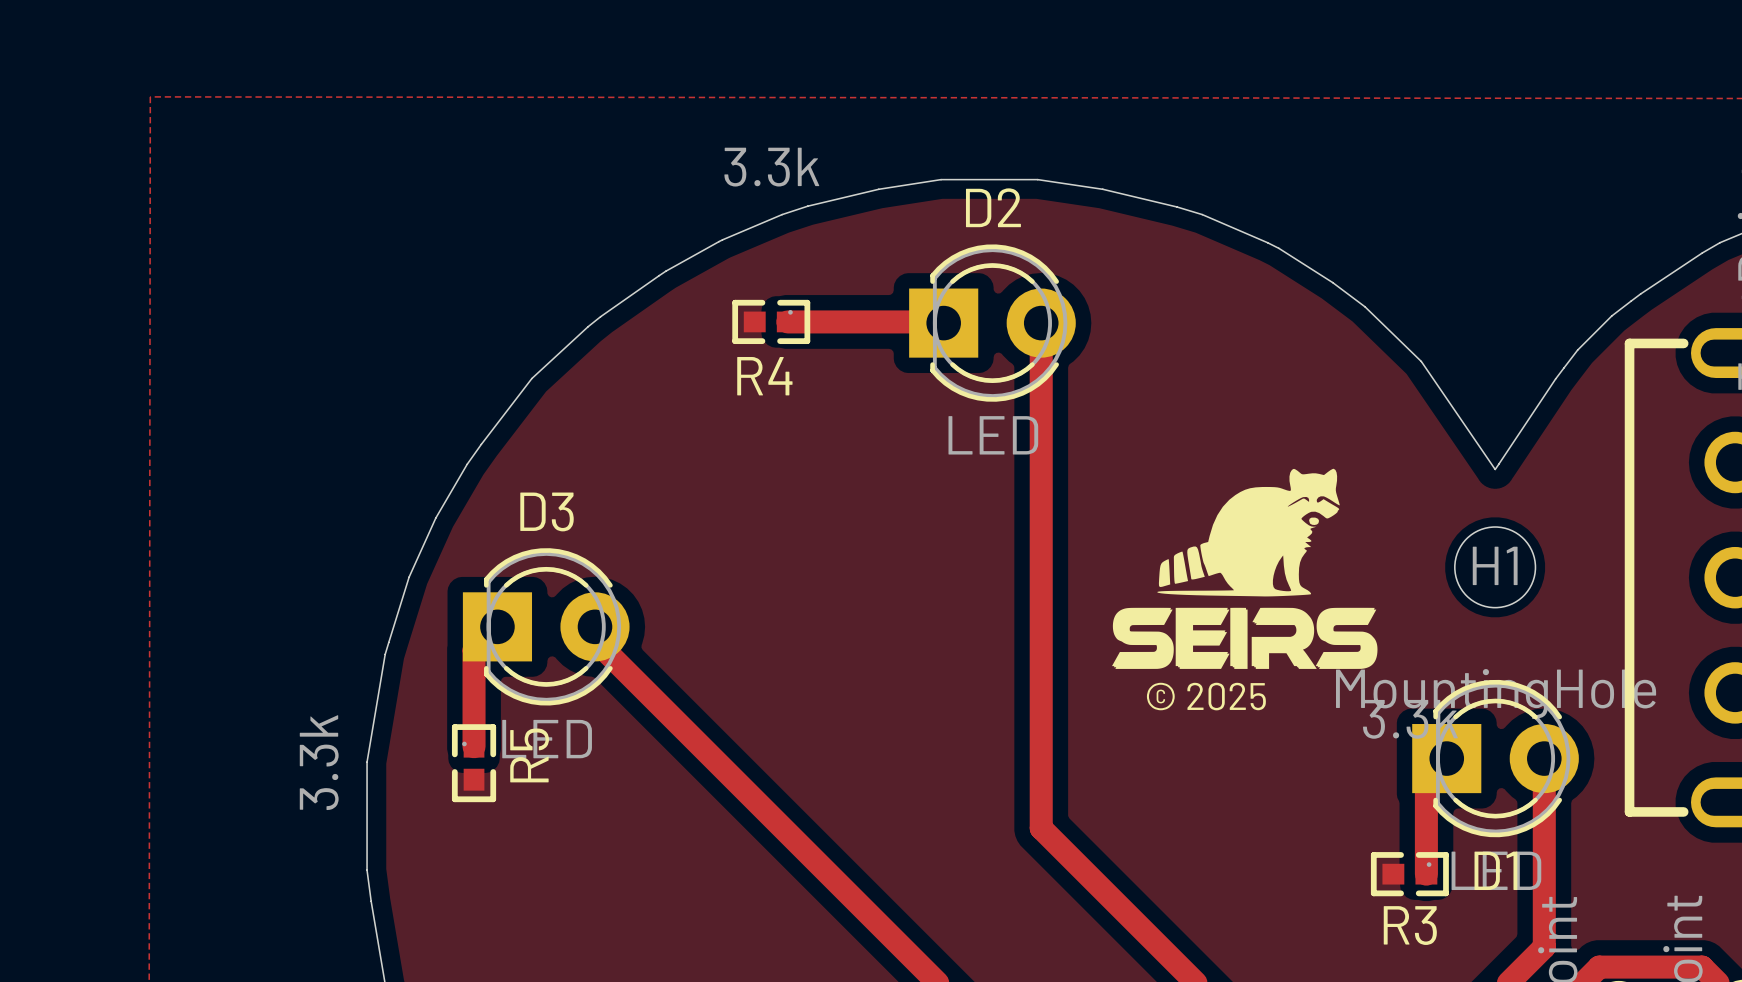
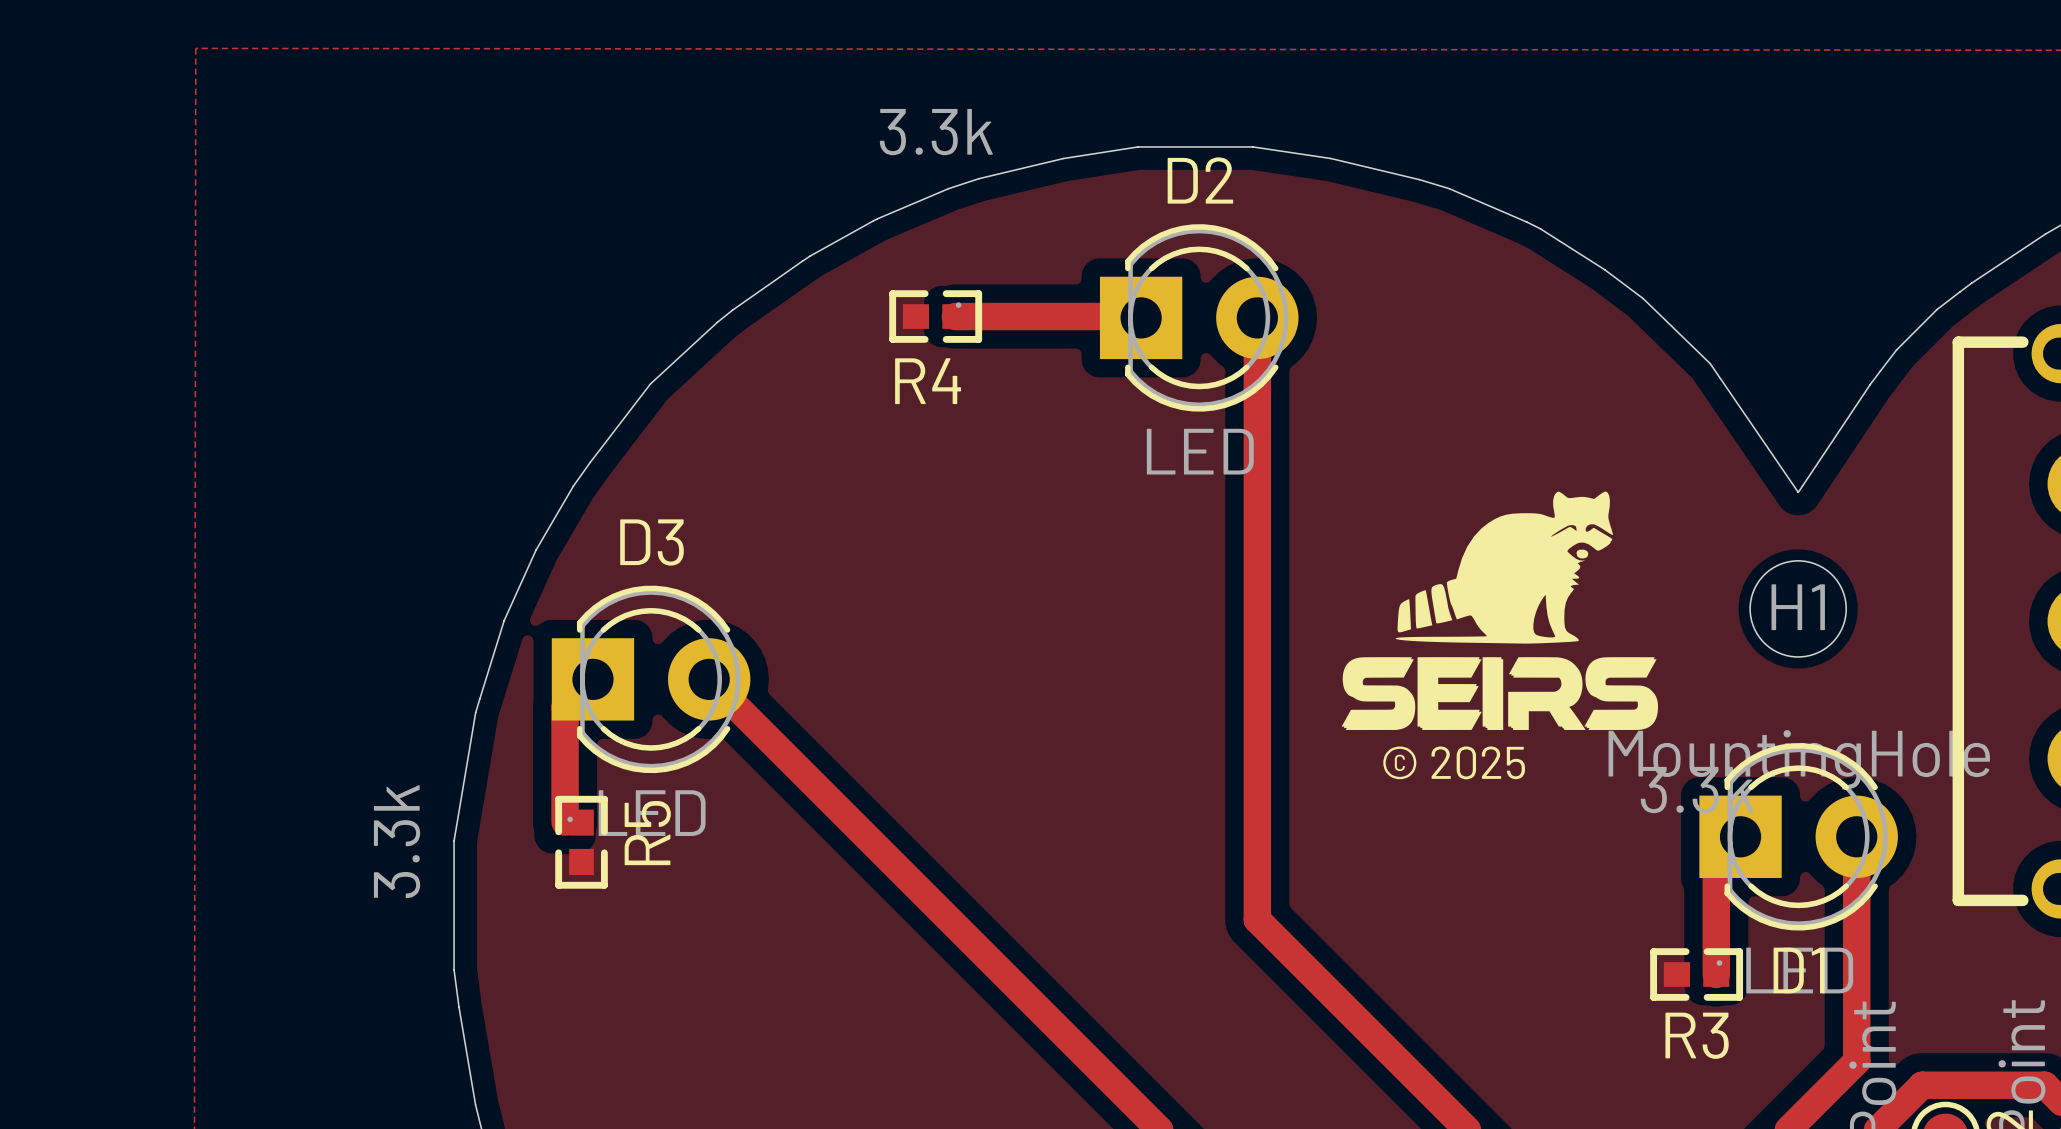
track: (497, 626) (474, 650) (474, 746) -> (592, 679) (565, 707) (565, 822)
D3 position: (546, 626) -> (651, 679)

